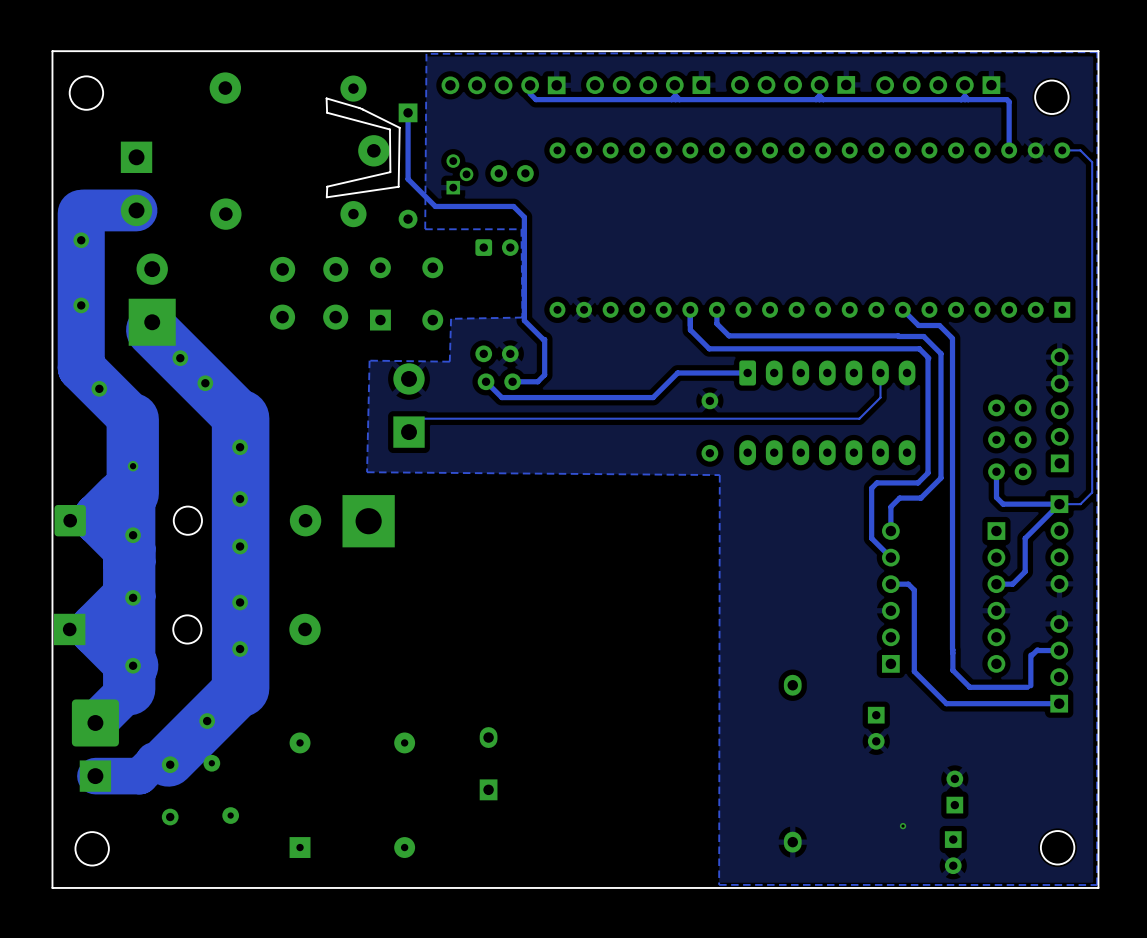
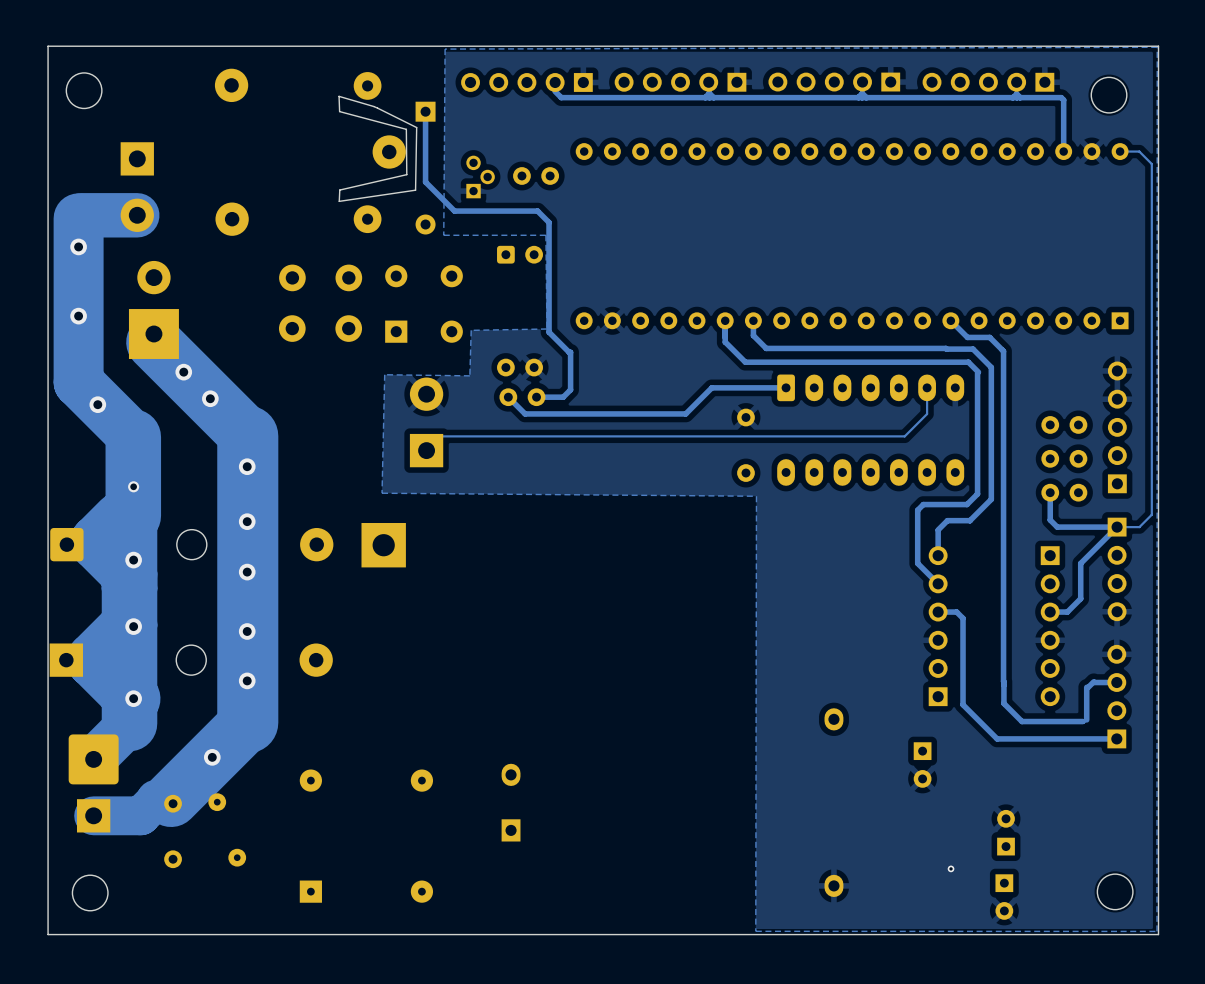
part footprint: [342, 495, 395, 548] -> [361, 523, 406, 568]

